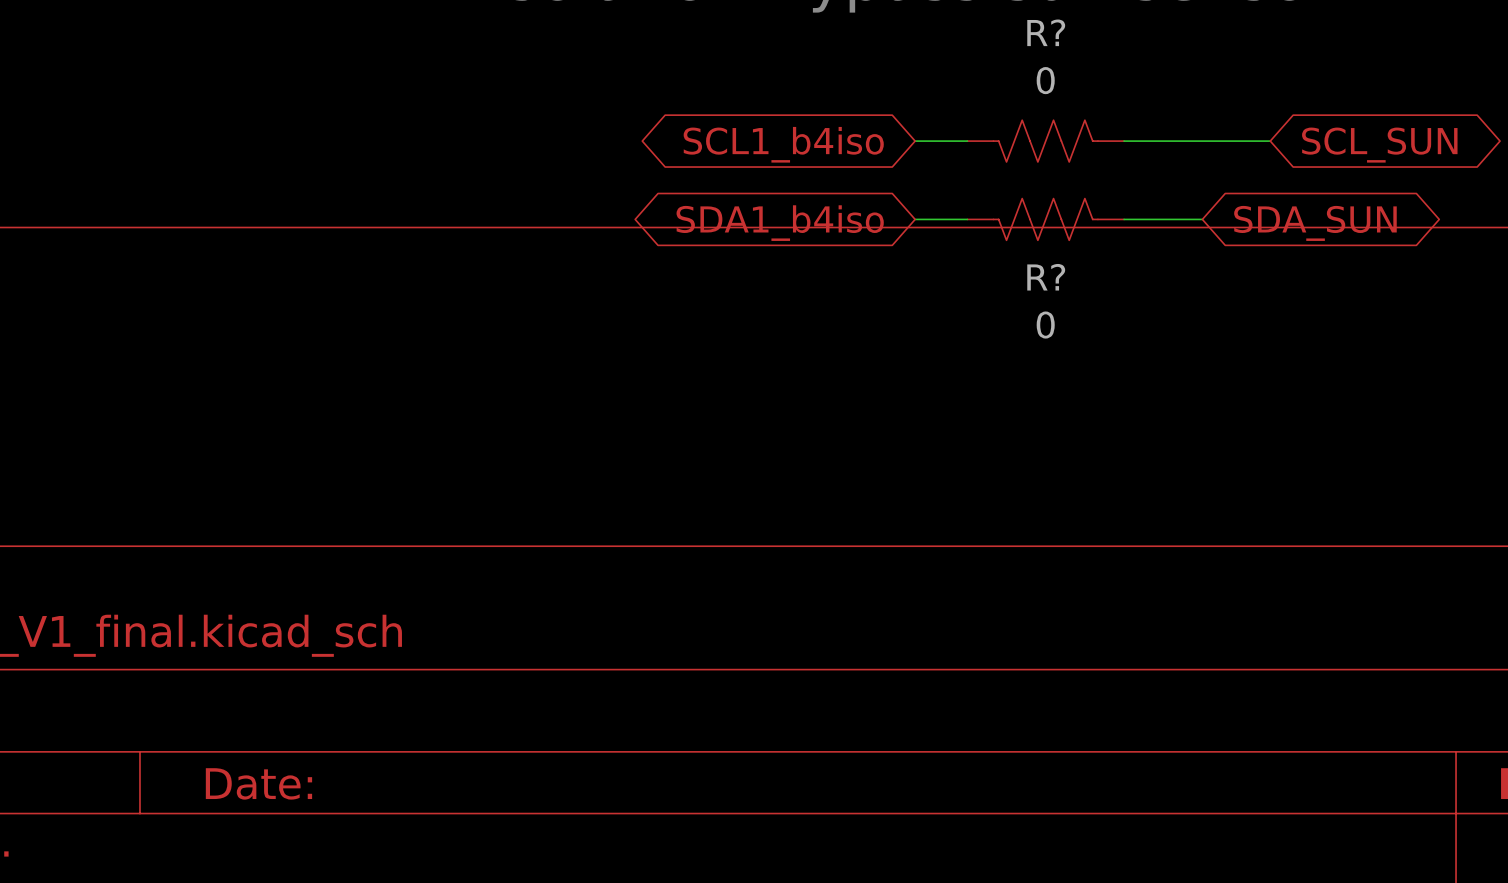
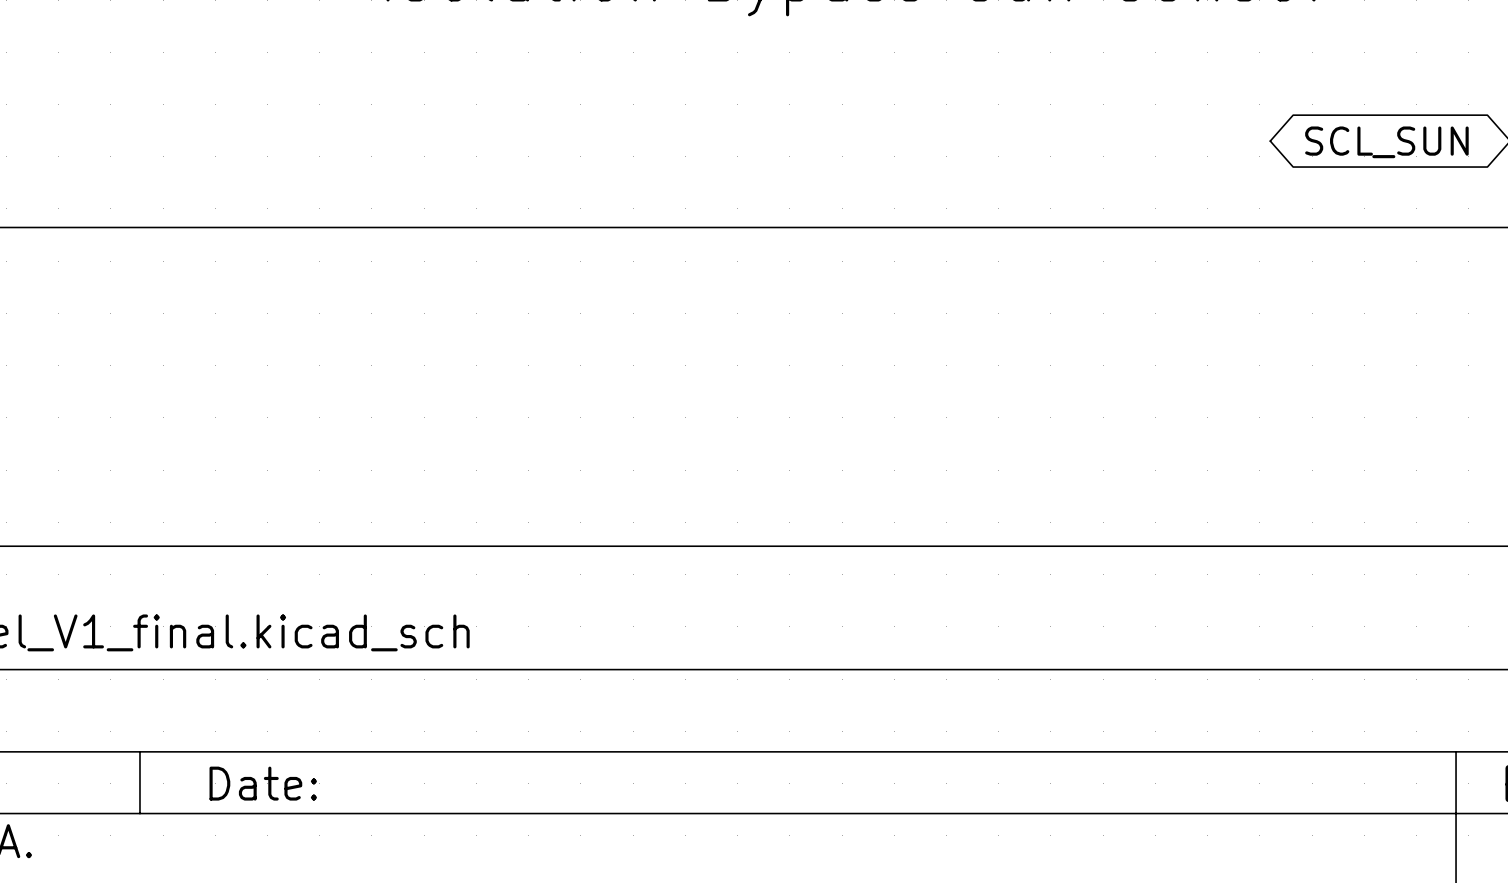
wire: (915, 141) (967, 141) -> none
R?: 0 (1045, 141) -> none
wire: (1124, 141) (1270, 141) -> none
global label: SCL1_b4iso (783, 144) -> none
wire: (915, 219) (967, 219) -> none
R?: 0 (1045, 219) -> none
wire: (1124, 219) (1202, 219) -> none
global label: SDA1_b4iso (780, 223) -> none
global label: SDA_SUN (1315, 223) -> none

